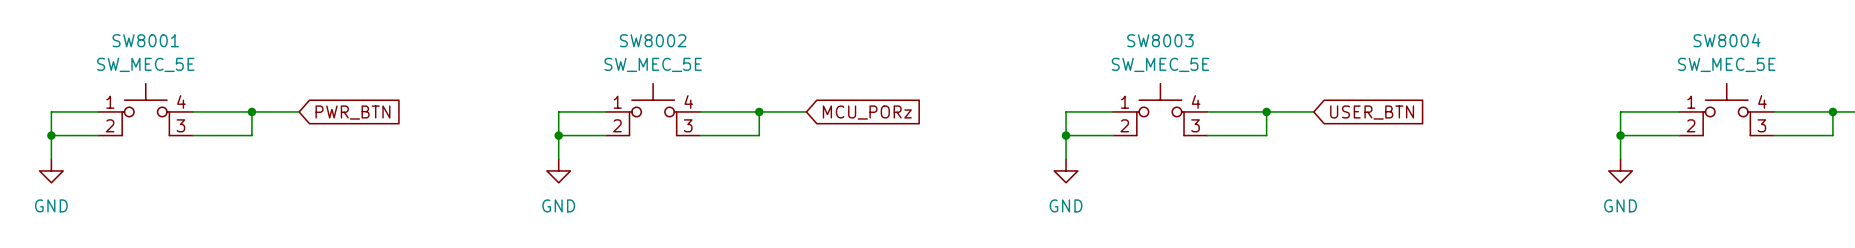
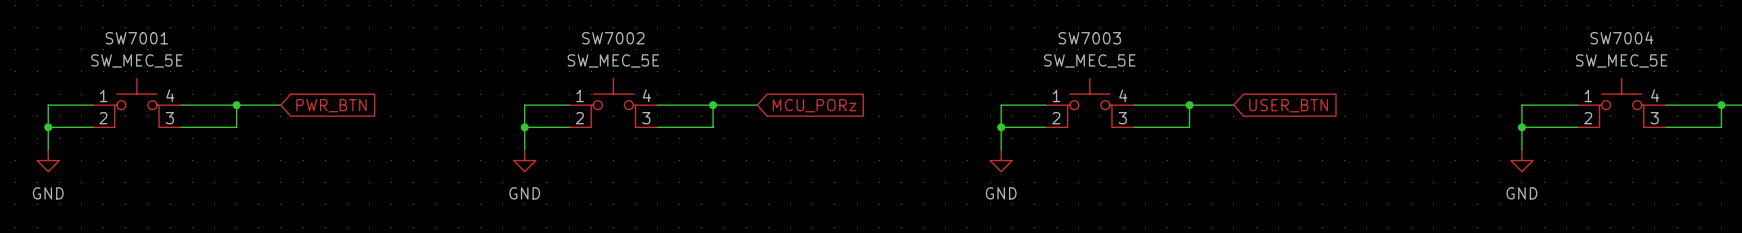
SW8001 name: SW8001 (145, 40) -> SW7001 (136, 38)
SW8002 name: SW8002 (653, 40) -> SW7002 (613, 38)
SW8003 name: SW8003 (1160, 40) -> SW7003 (1089, 38)
SW8004 name: SW8004 (1727, 40) -> SW7004 (1621, 37)

